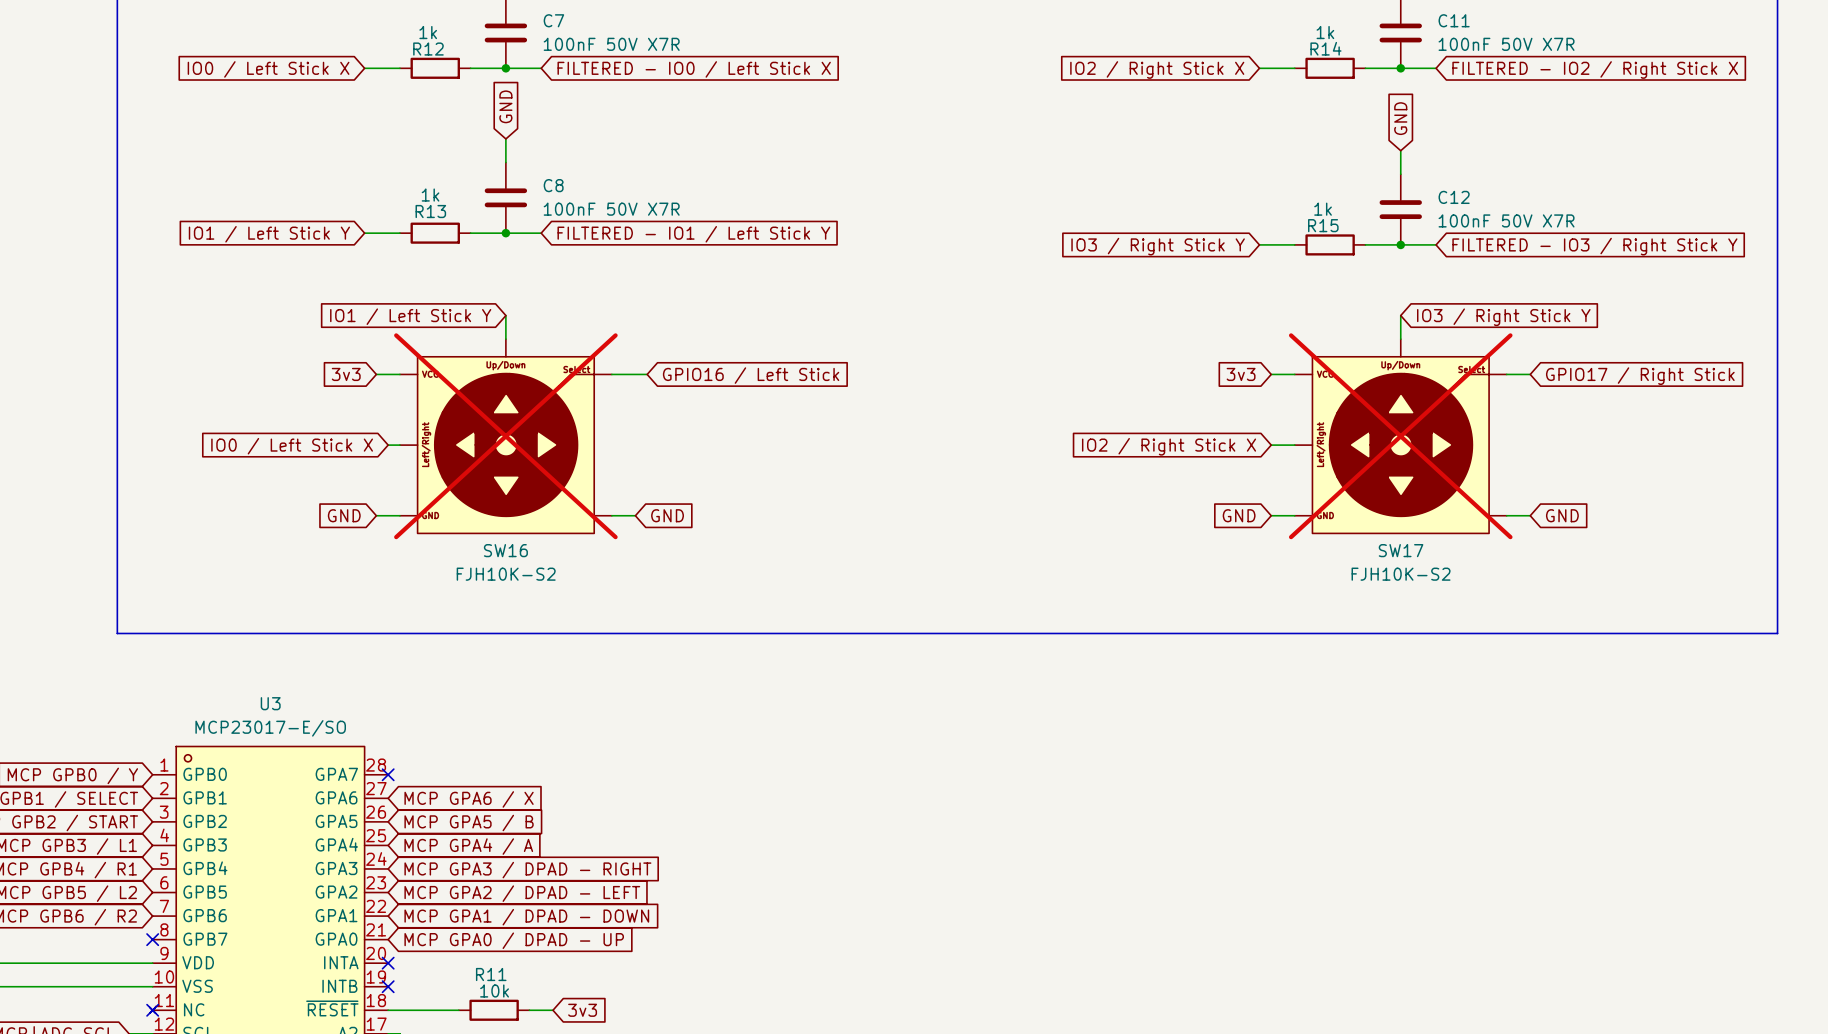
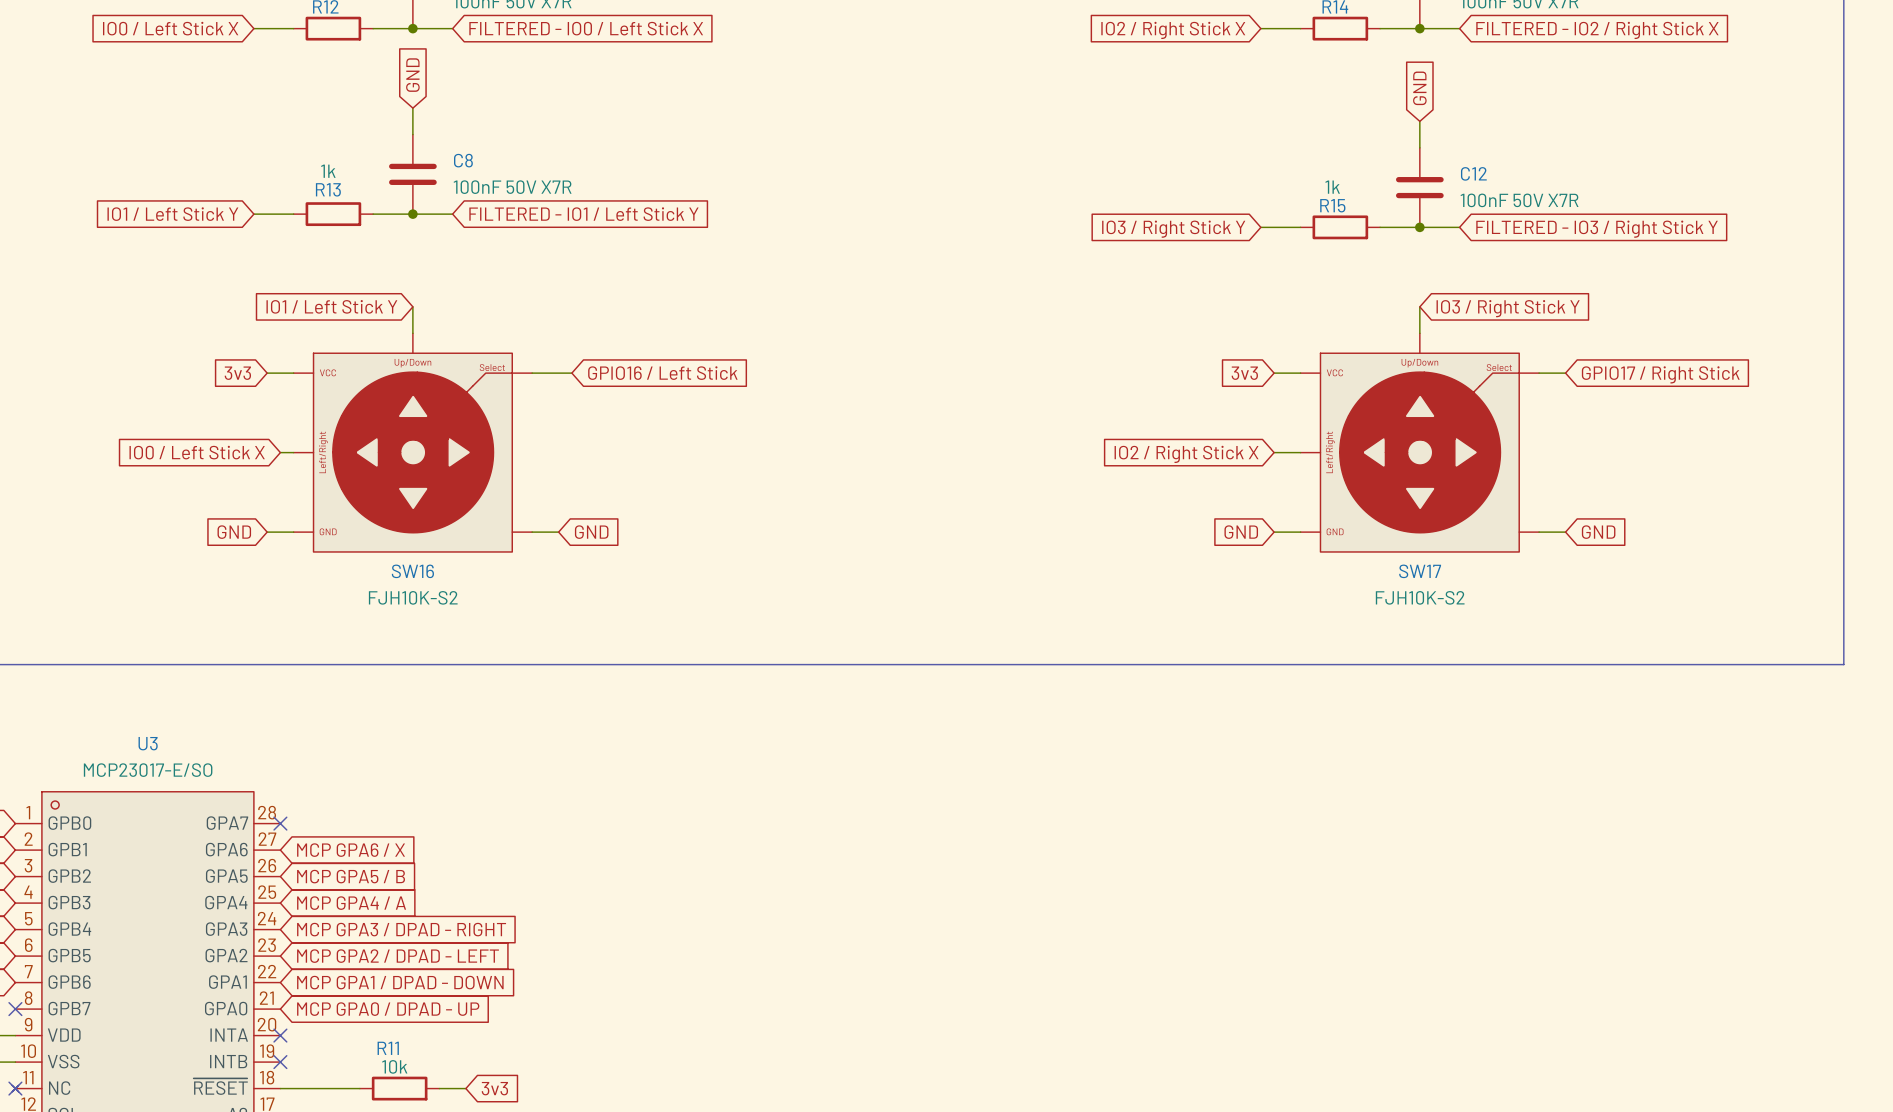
SW16 do-not-place cross: (505, 436) -> none
SW17 do-not-place cross: (1400, 436) -> none

